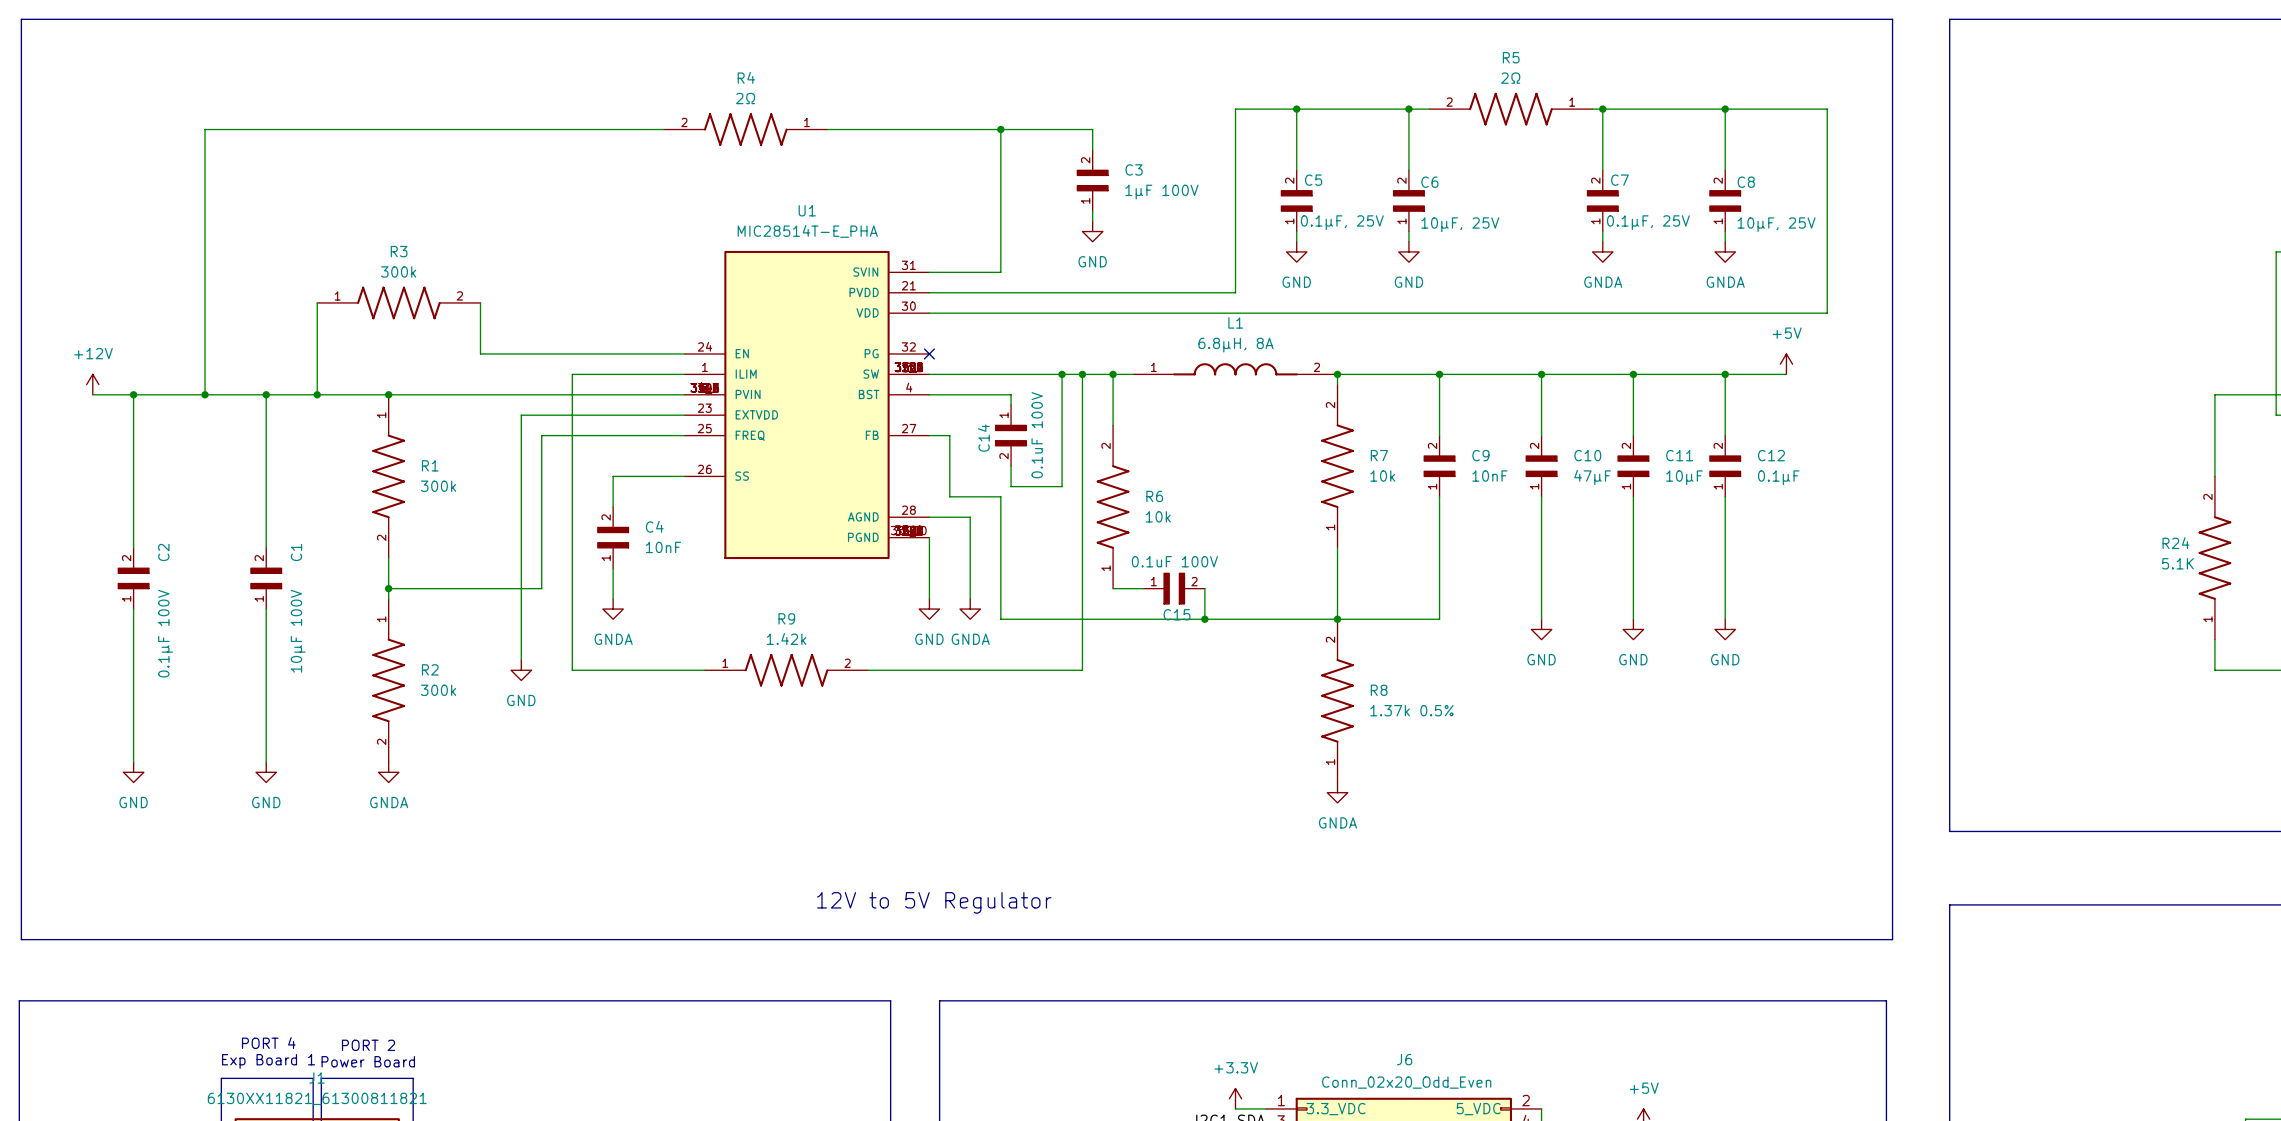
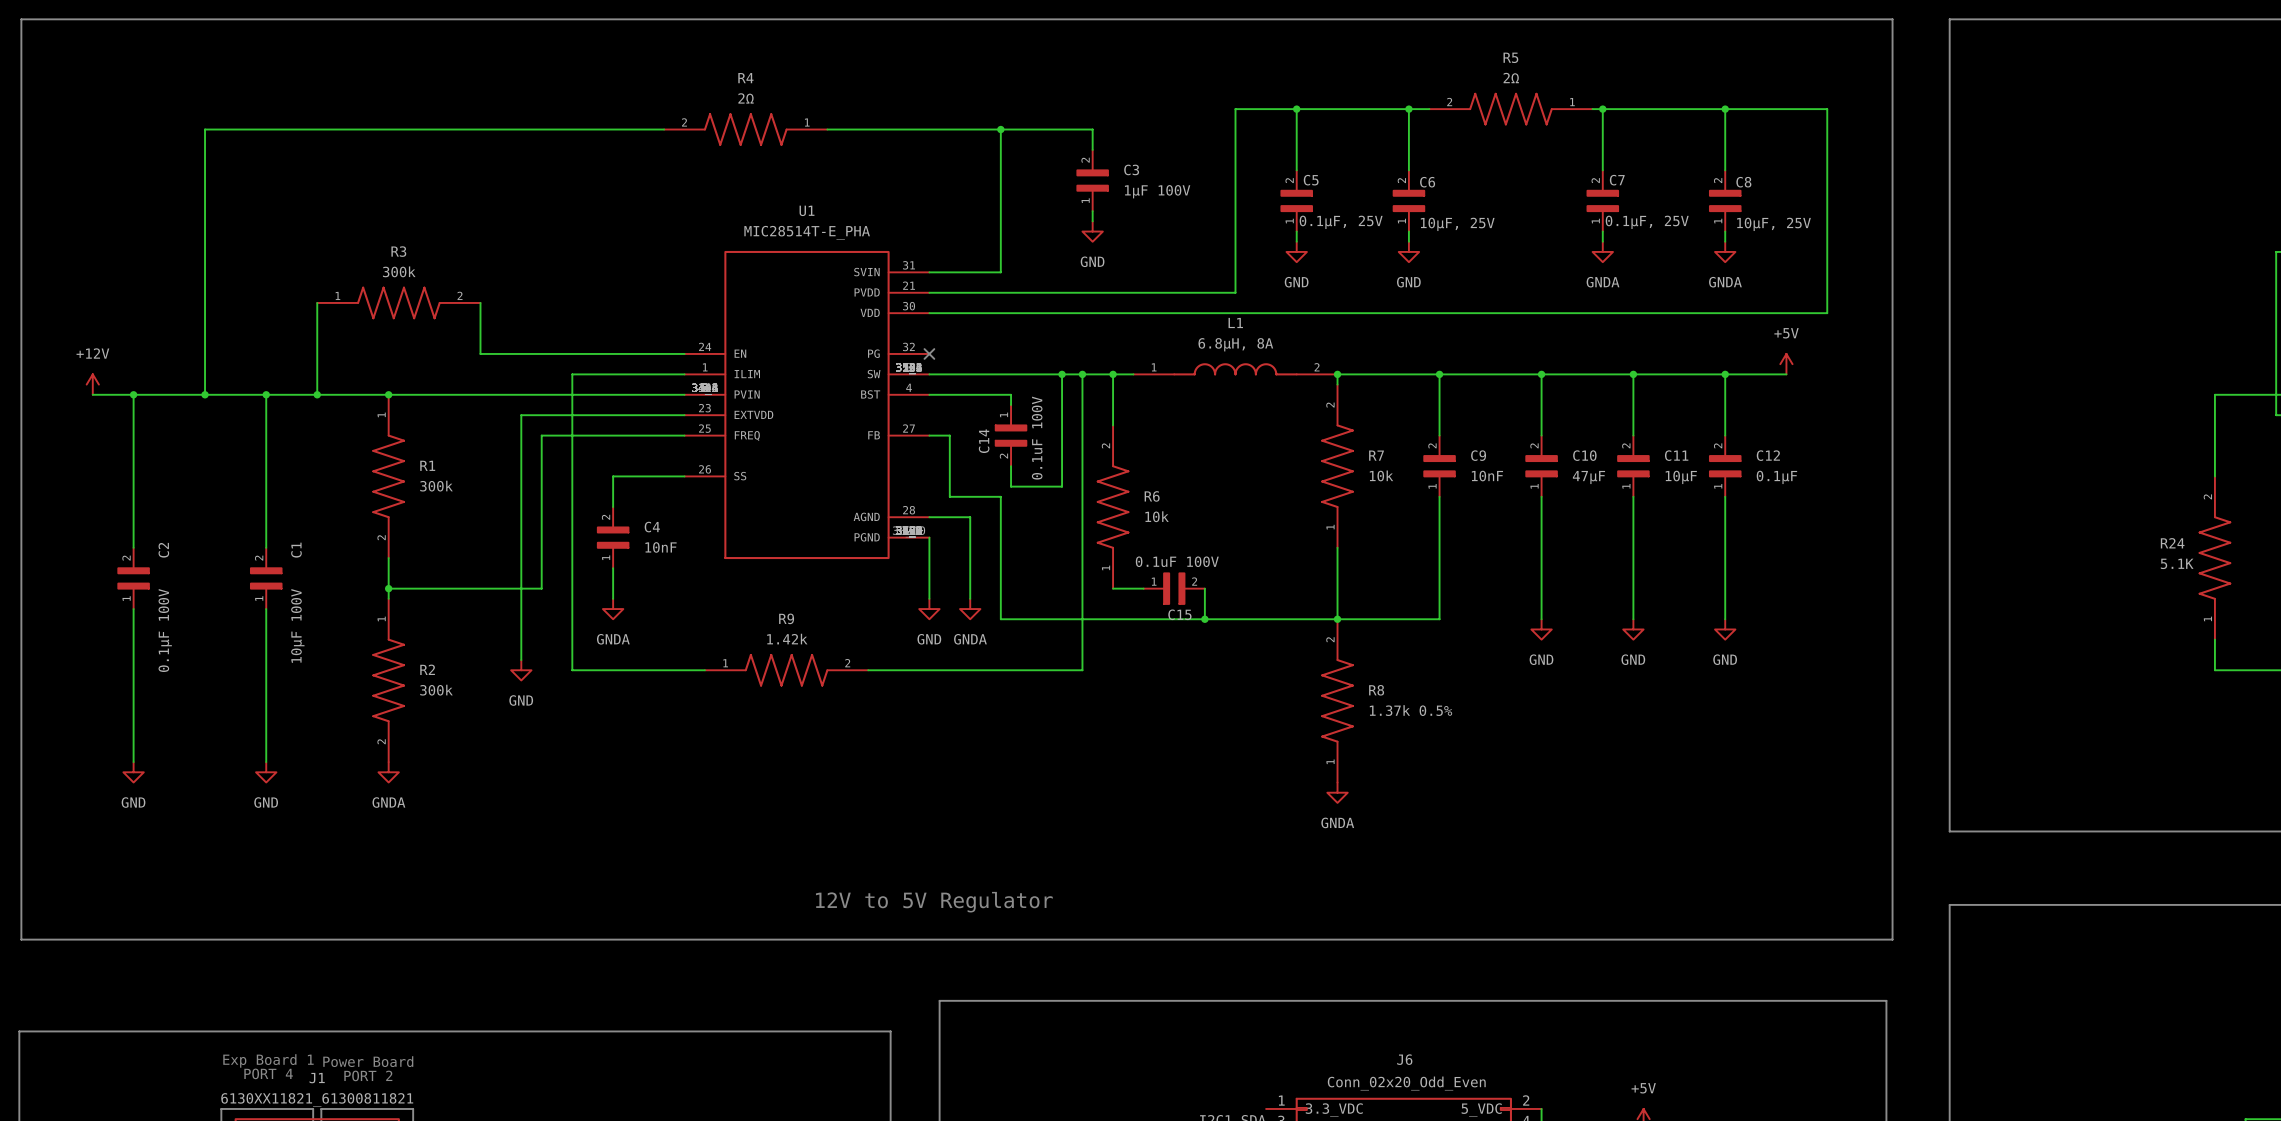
line: (19, 1031) (19, 1000) (890, 1000) (890, 1031) -> (19, 1031) (890, 1031)
text position: PORT 4 (268, 1043) -> PORT 4 (268, 1073)
text position: PORT 2 (368, 1045) -> PORT 2 (368, 1075)
power symbol: +3.3V (1235, 1098) -> none
line: (221, 1108) (221, 1078) (313, 1078) (313, 1108) -> (221, 1108) (313, 1108)
line: (321, 1108) (321, 1078) (413, 1078) (413, 1108) -> (321, 1108) (413, 1108)
wire: (1235, 1108) (1266, 1108) -> none

